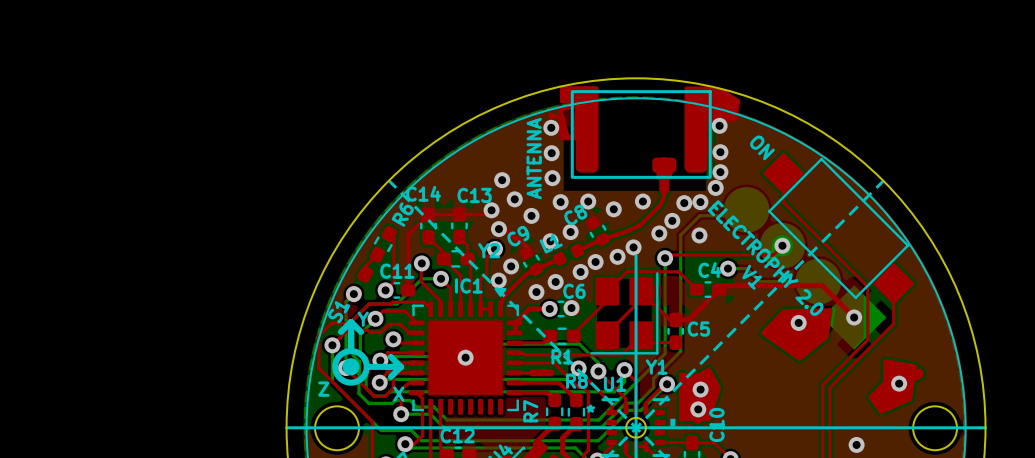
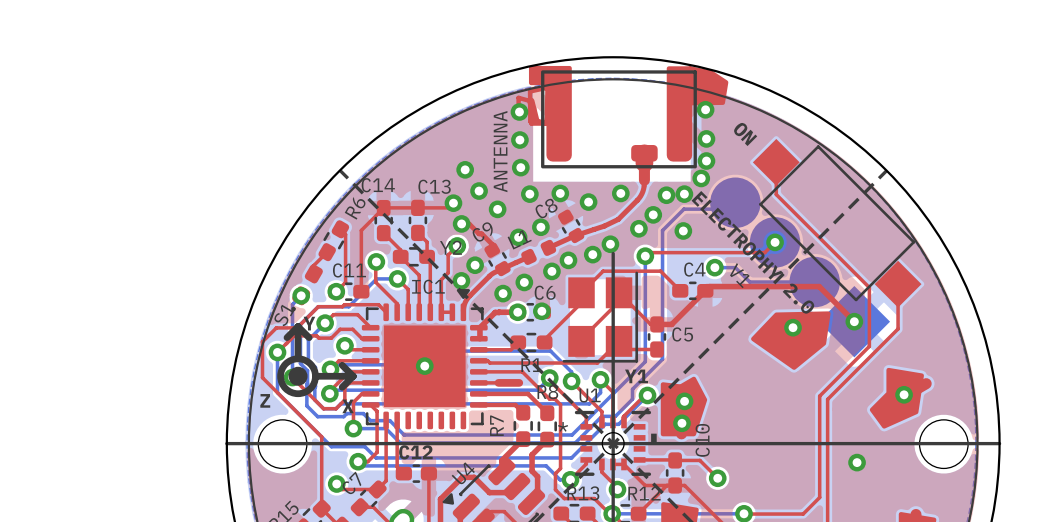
ON name: ON (762, 147) -> none
text: none -> ON (745, 134)

